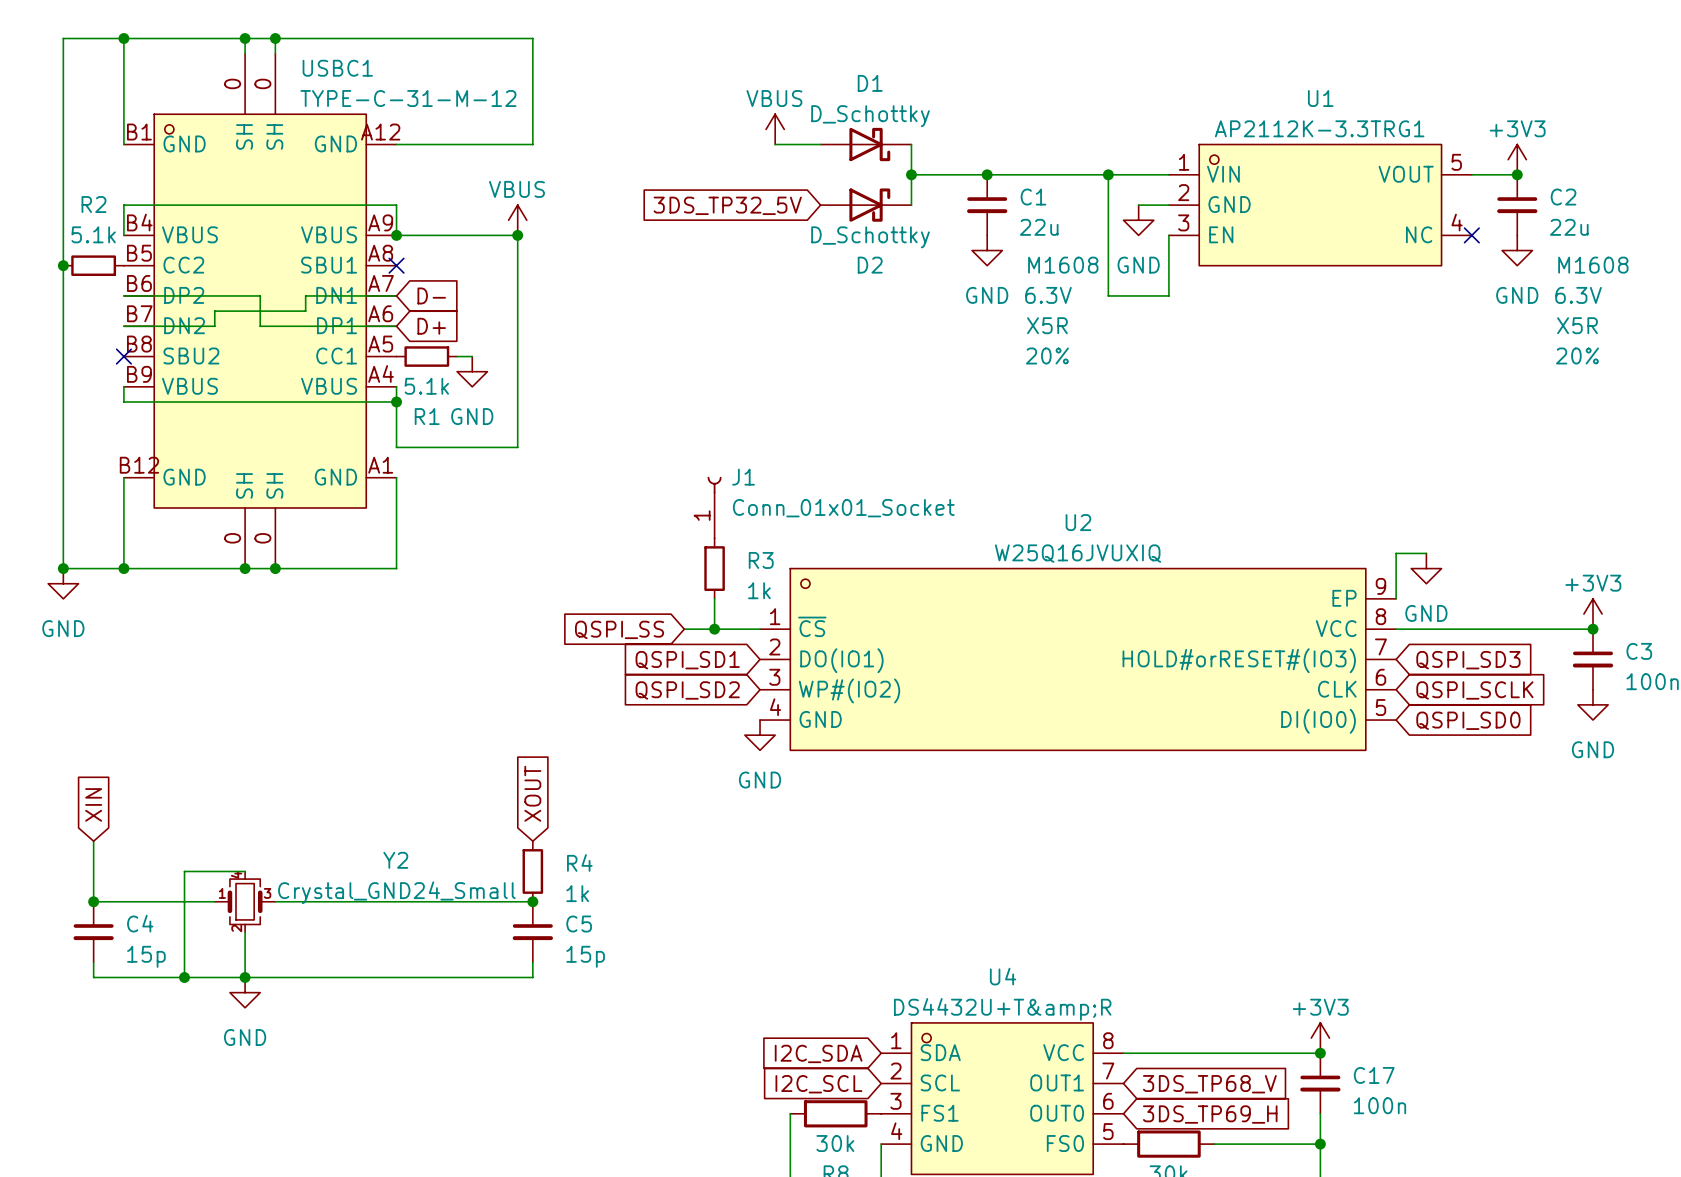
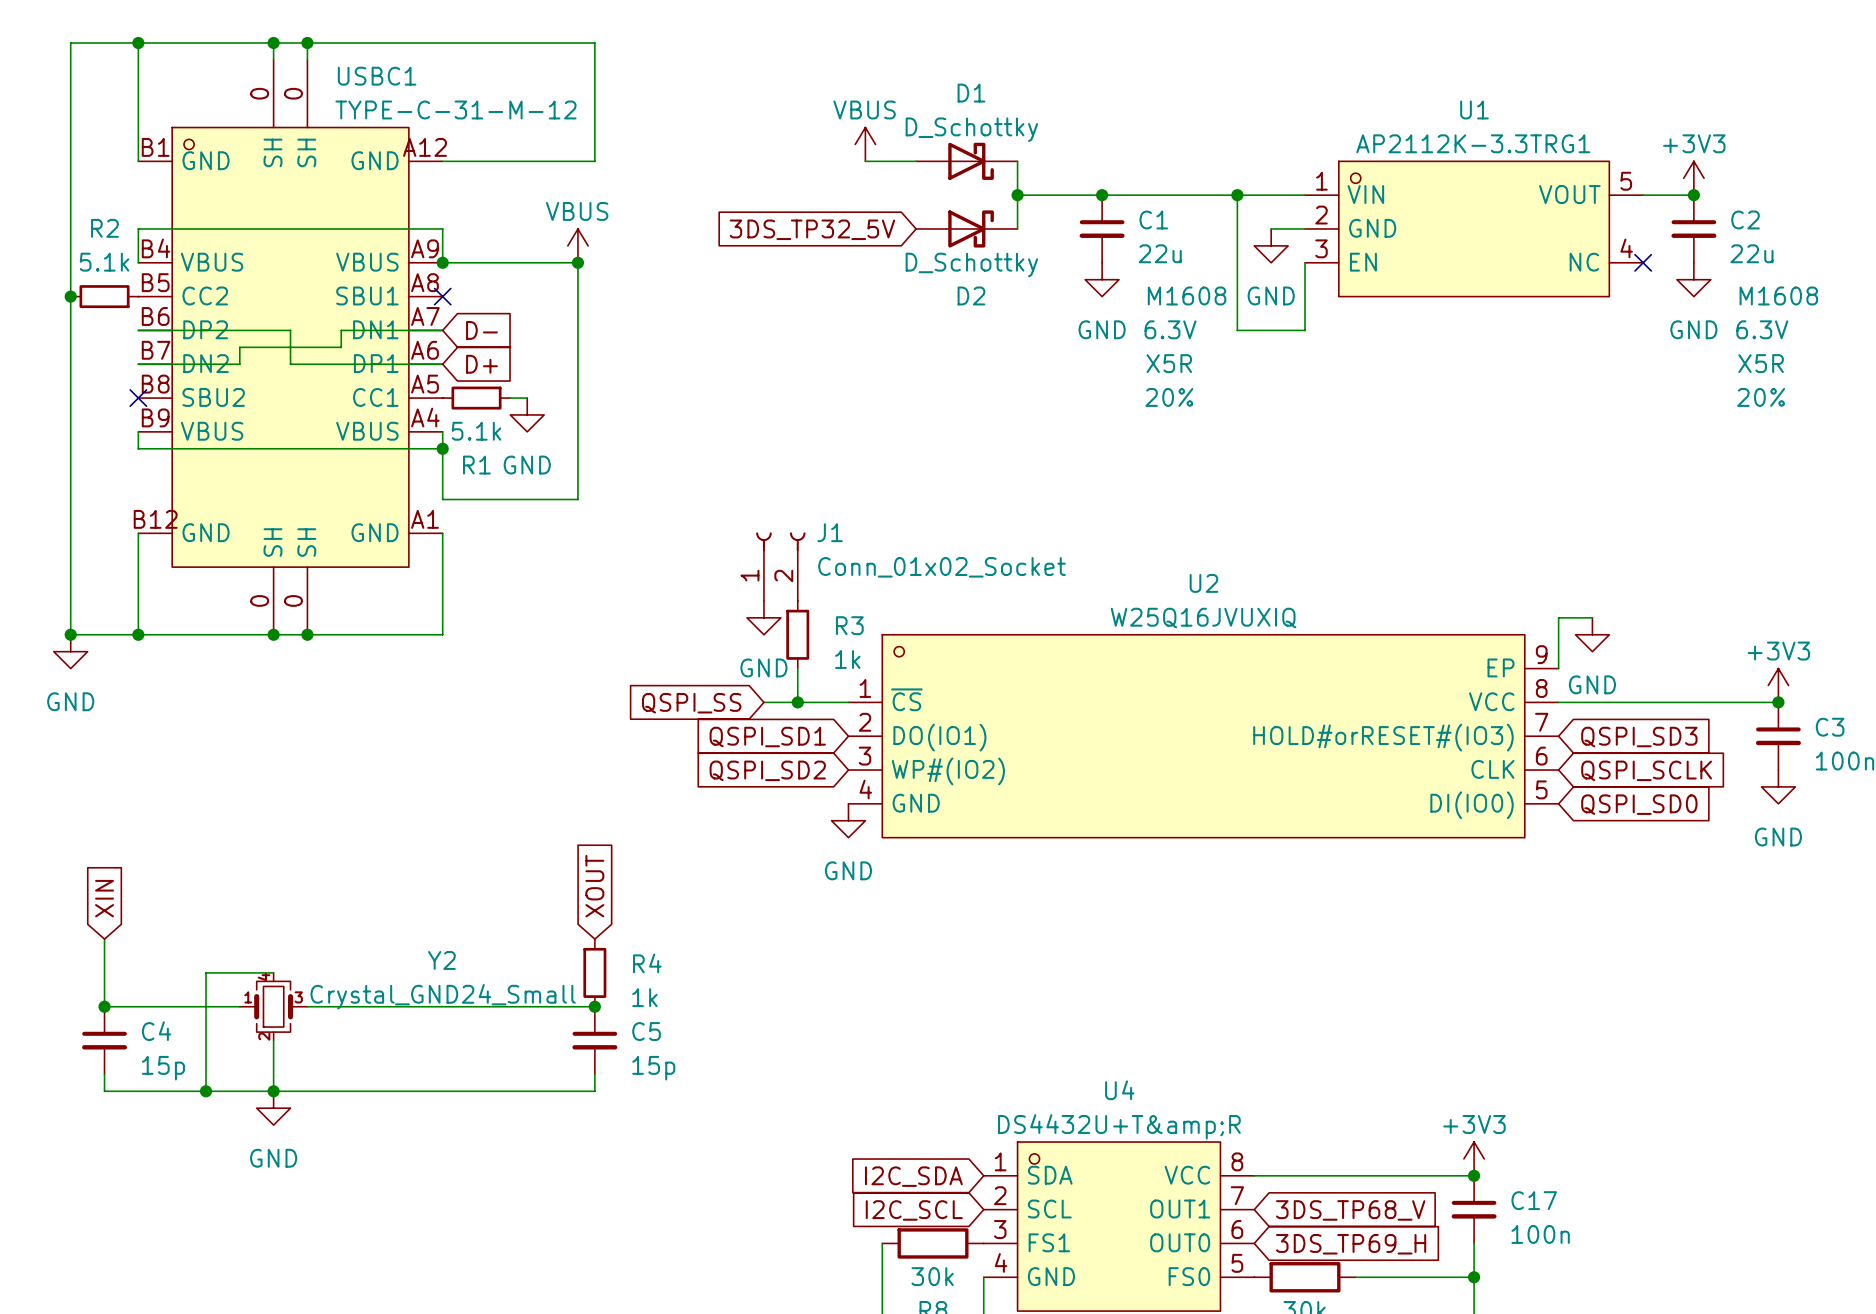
J1 symbol: [707, 476, 722, 539] -> [756, 532, 806, 601]
J1 value: Conn_01x01_Socket (843, 508) -> Conn_01x02_Socket (942, 567)
power symbol: none -> GND (763, 617)

